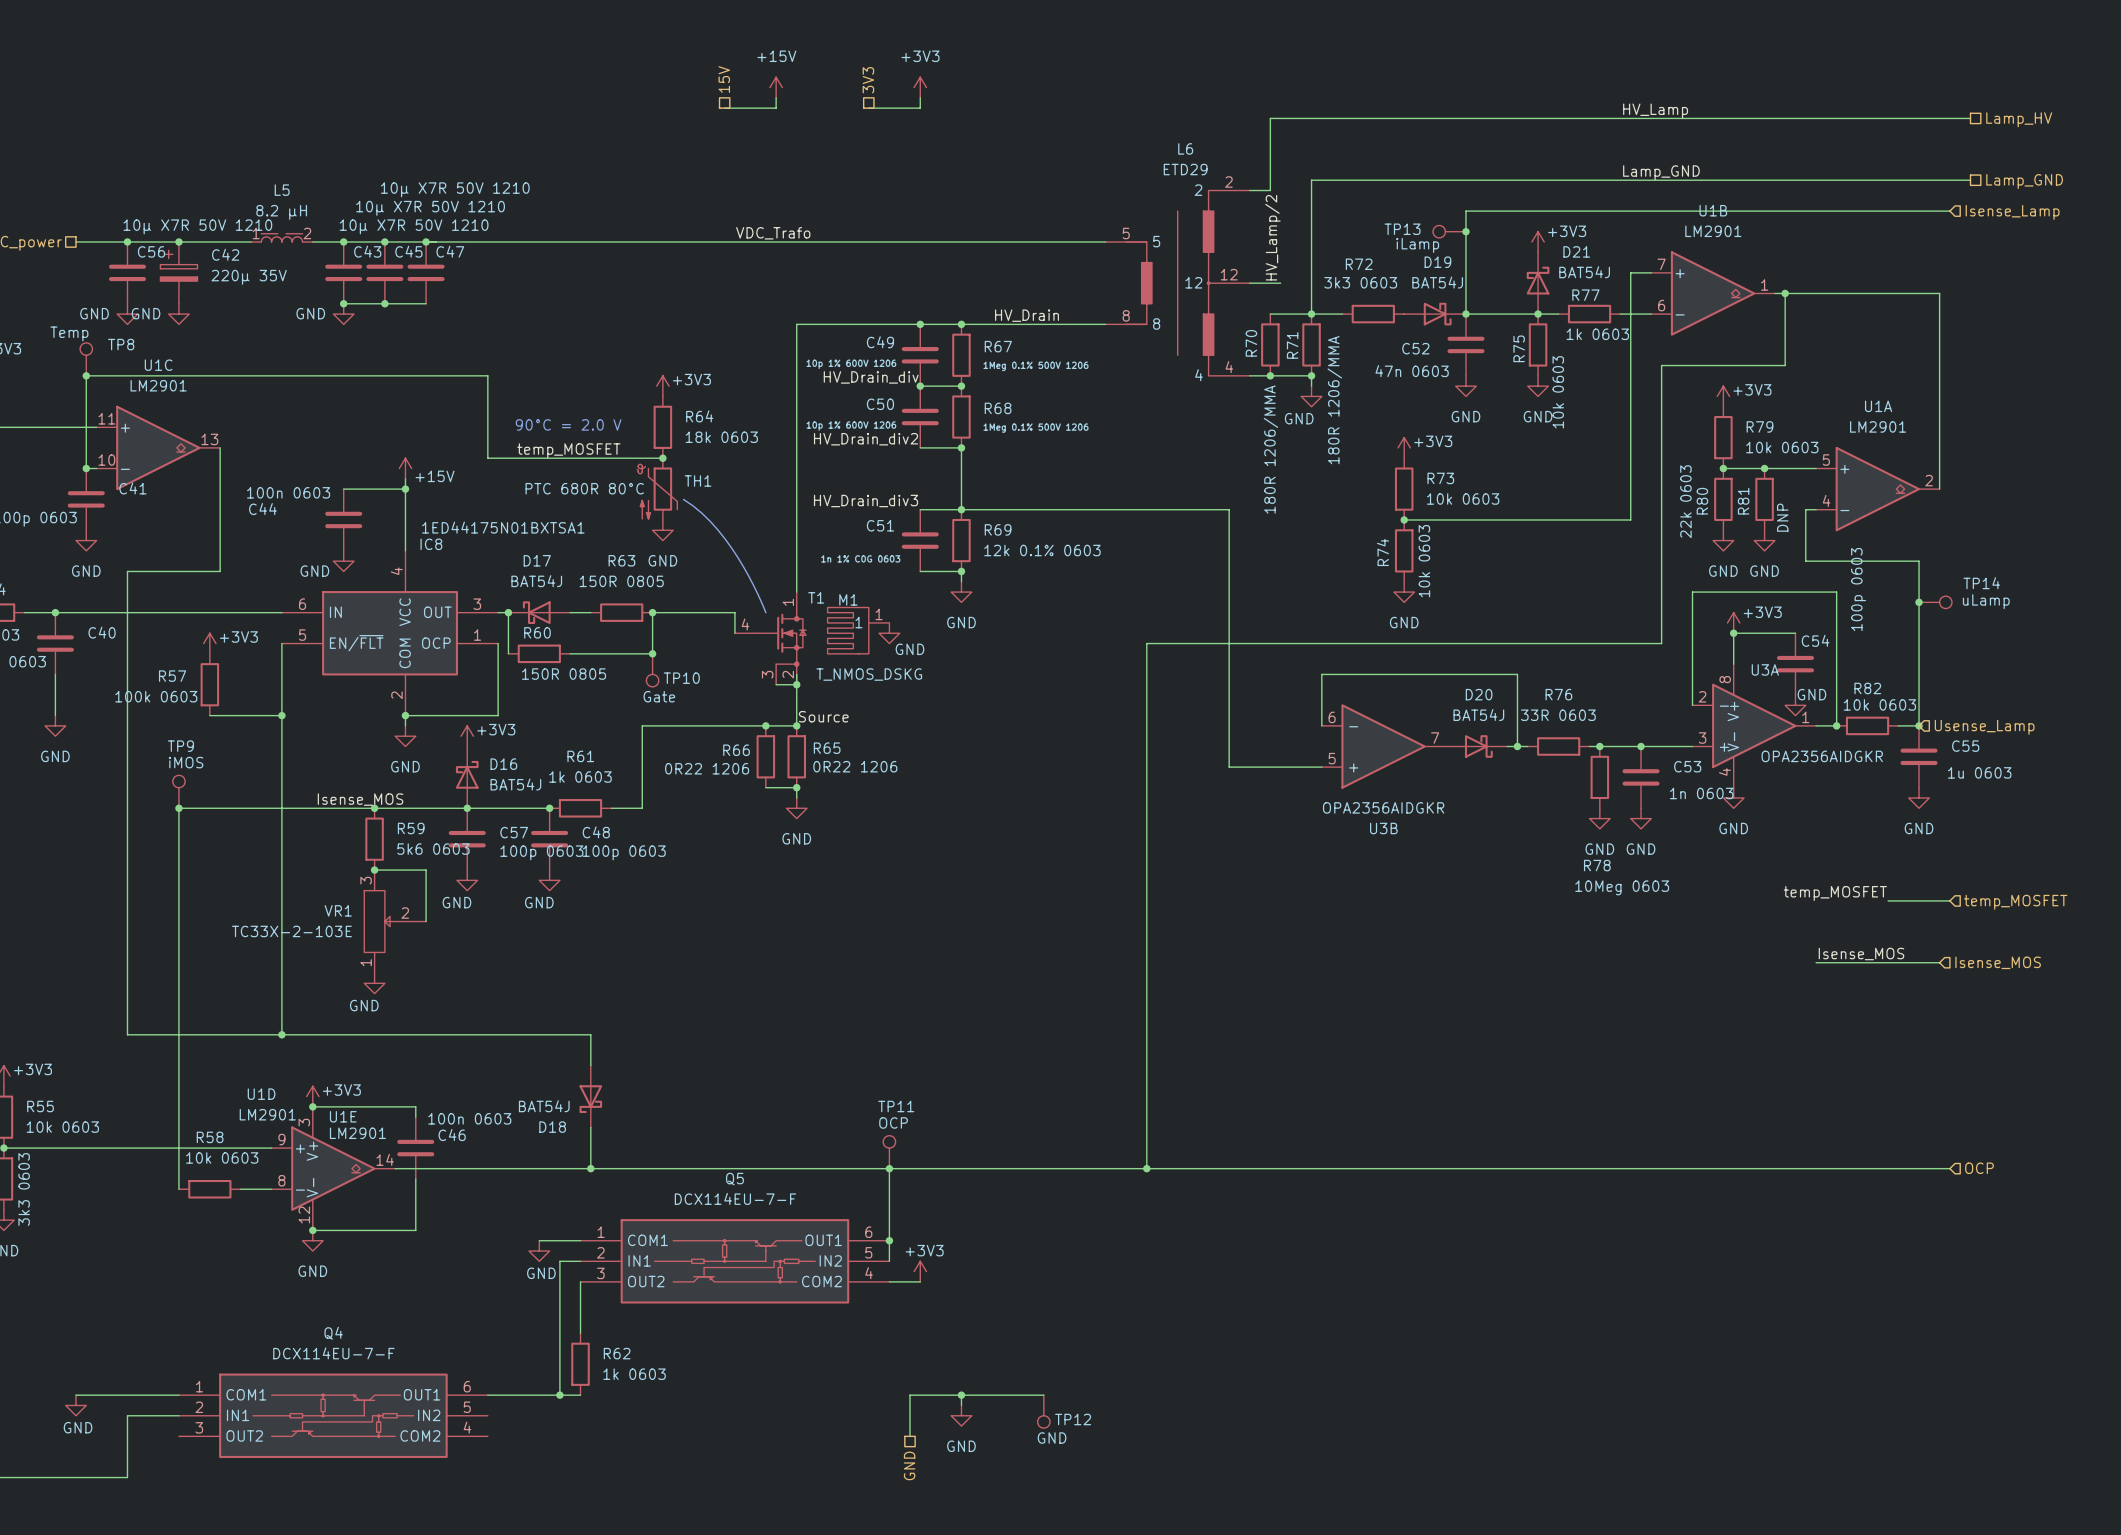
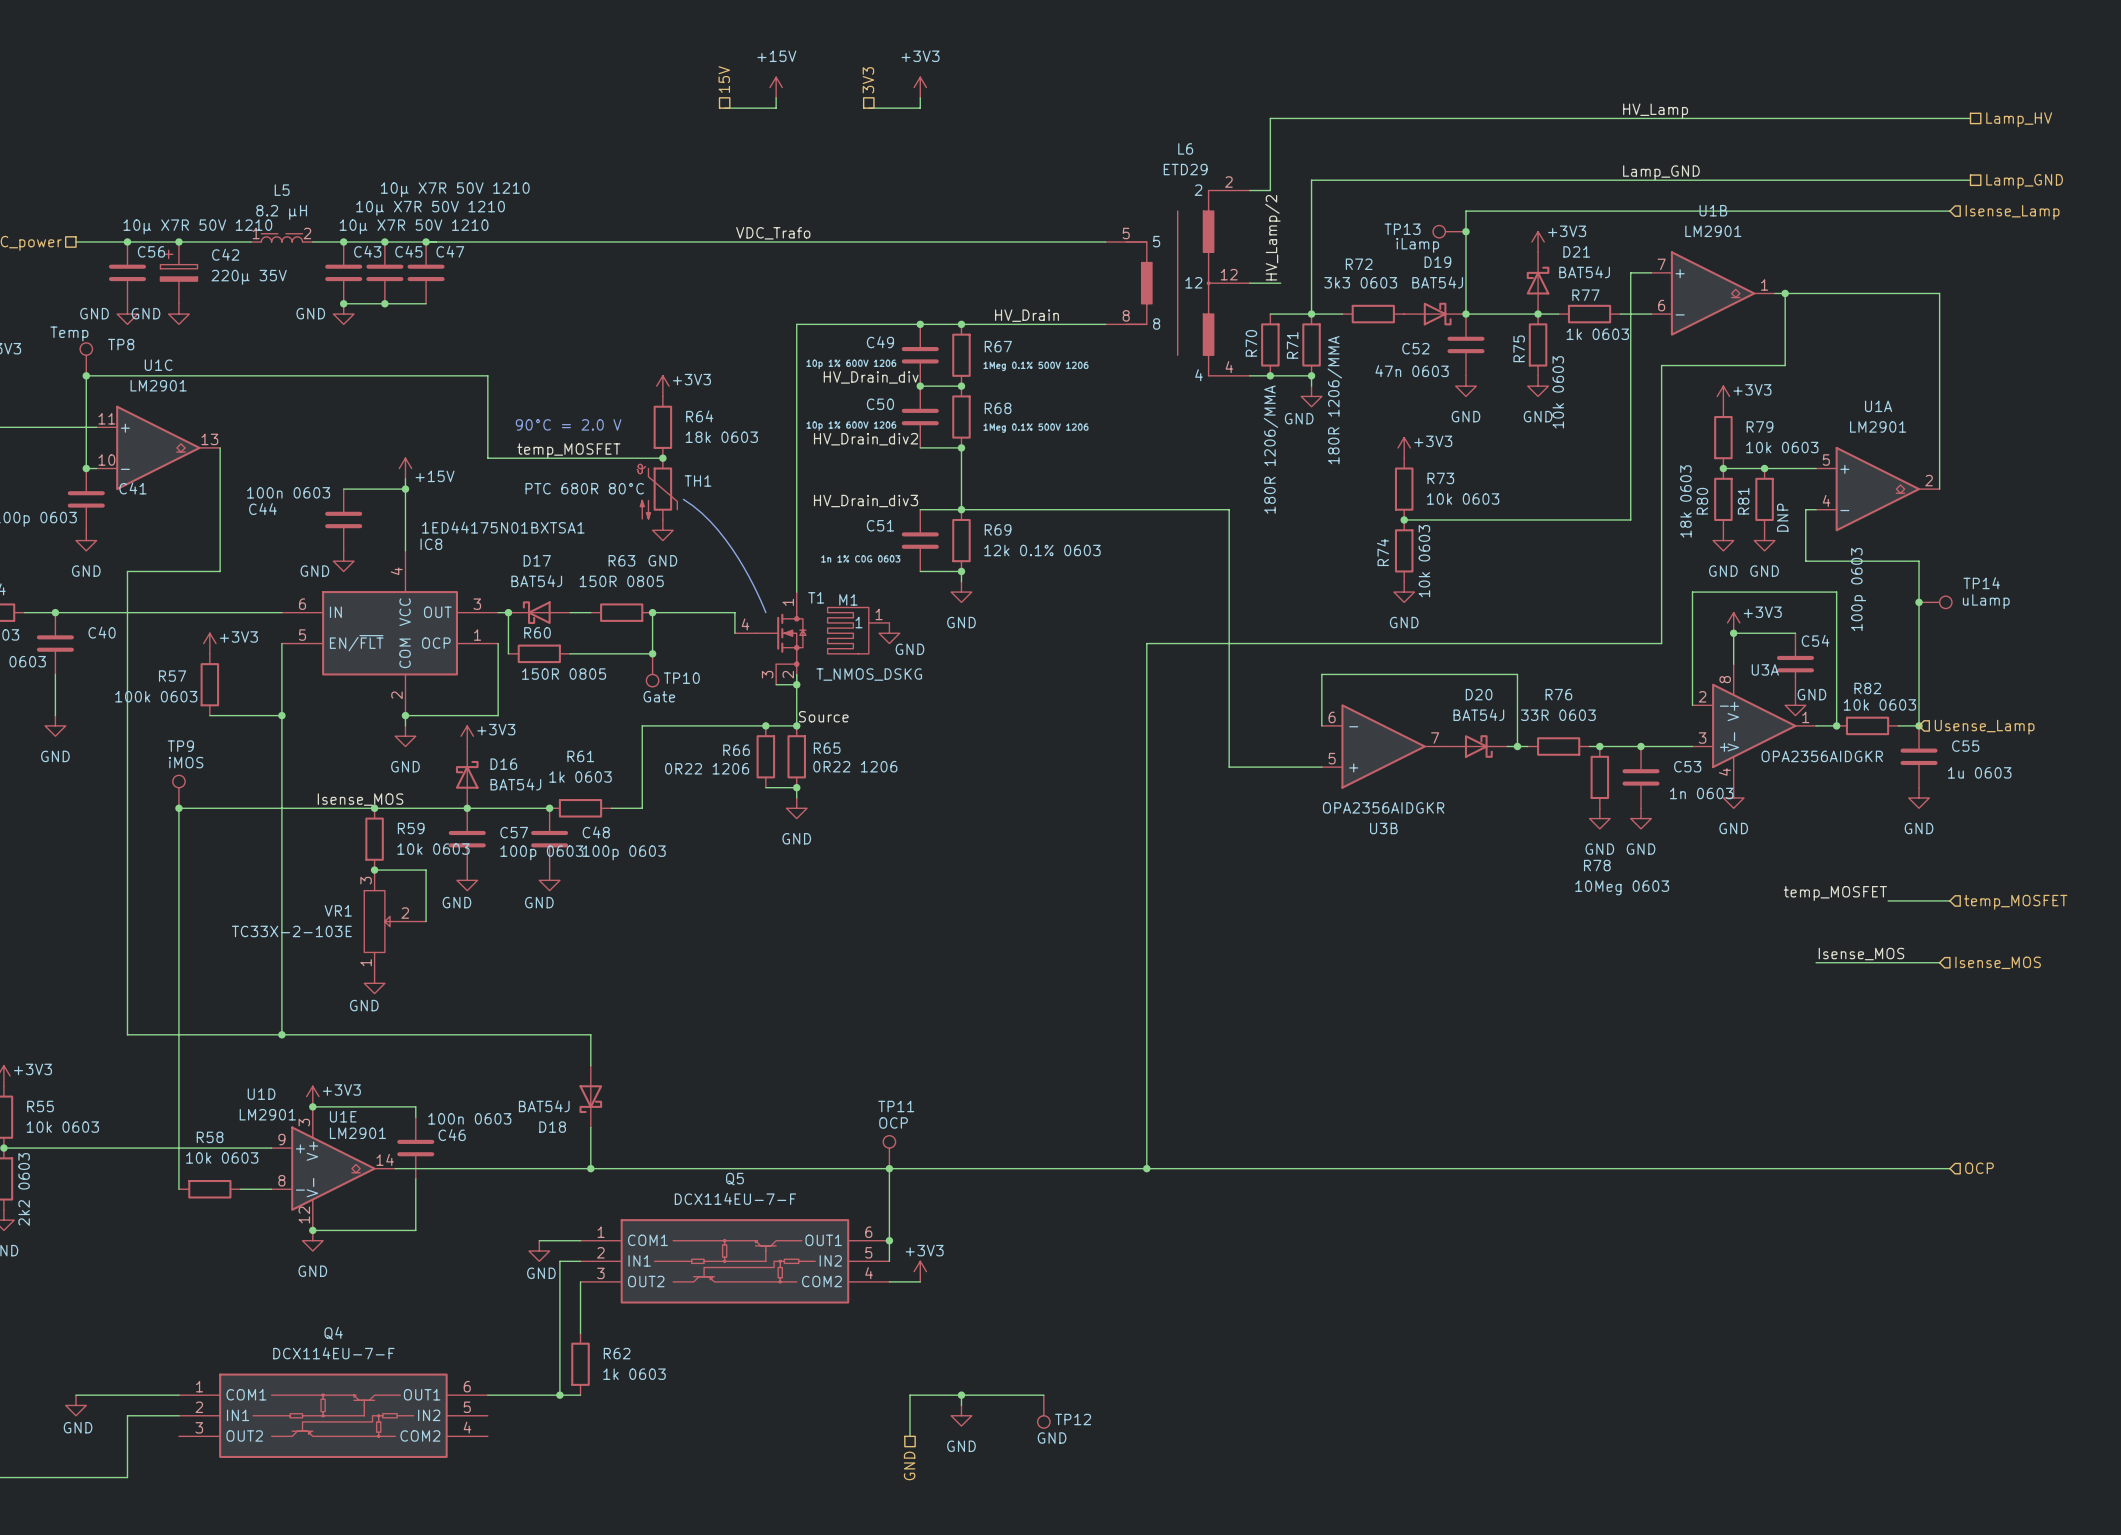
R80 value: 22k 0603 (1685, 501) -> 18k 0603 (1685, 501)
R59 value: 5k6 0603 (433, 849) -> 10k 0603 (433, 849)
part value: 3k3 0603 (24, 1189) -> 2k2 0603 (24, 1189)

